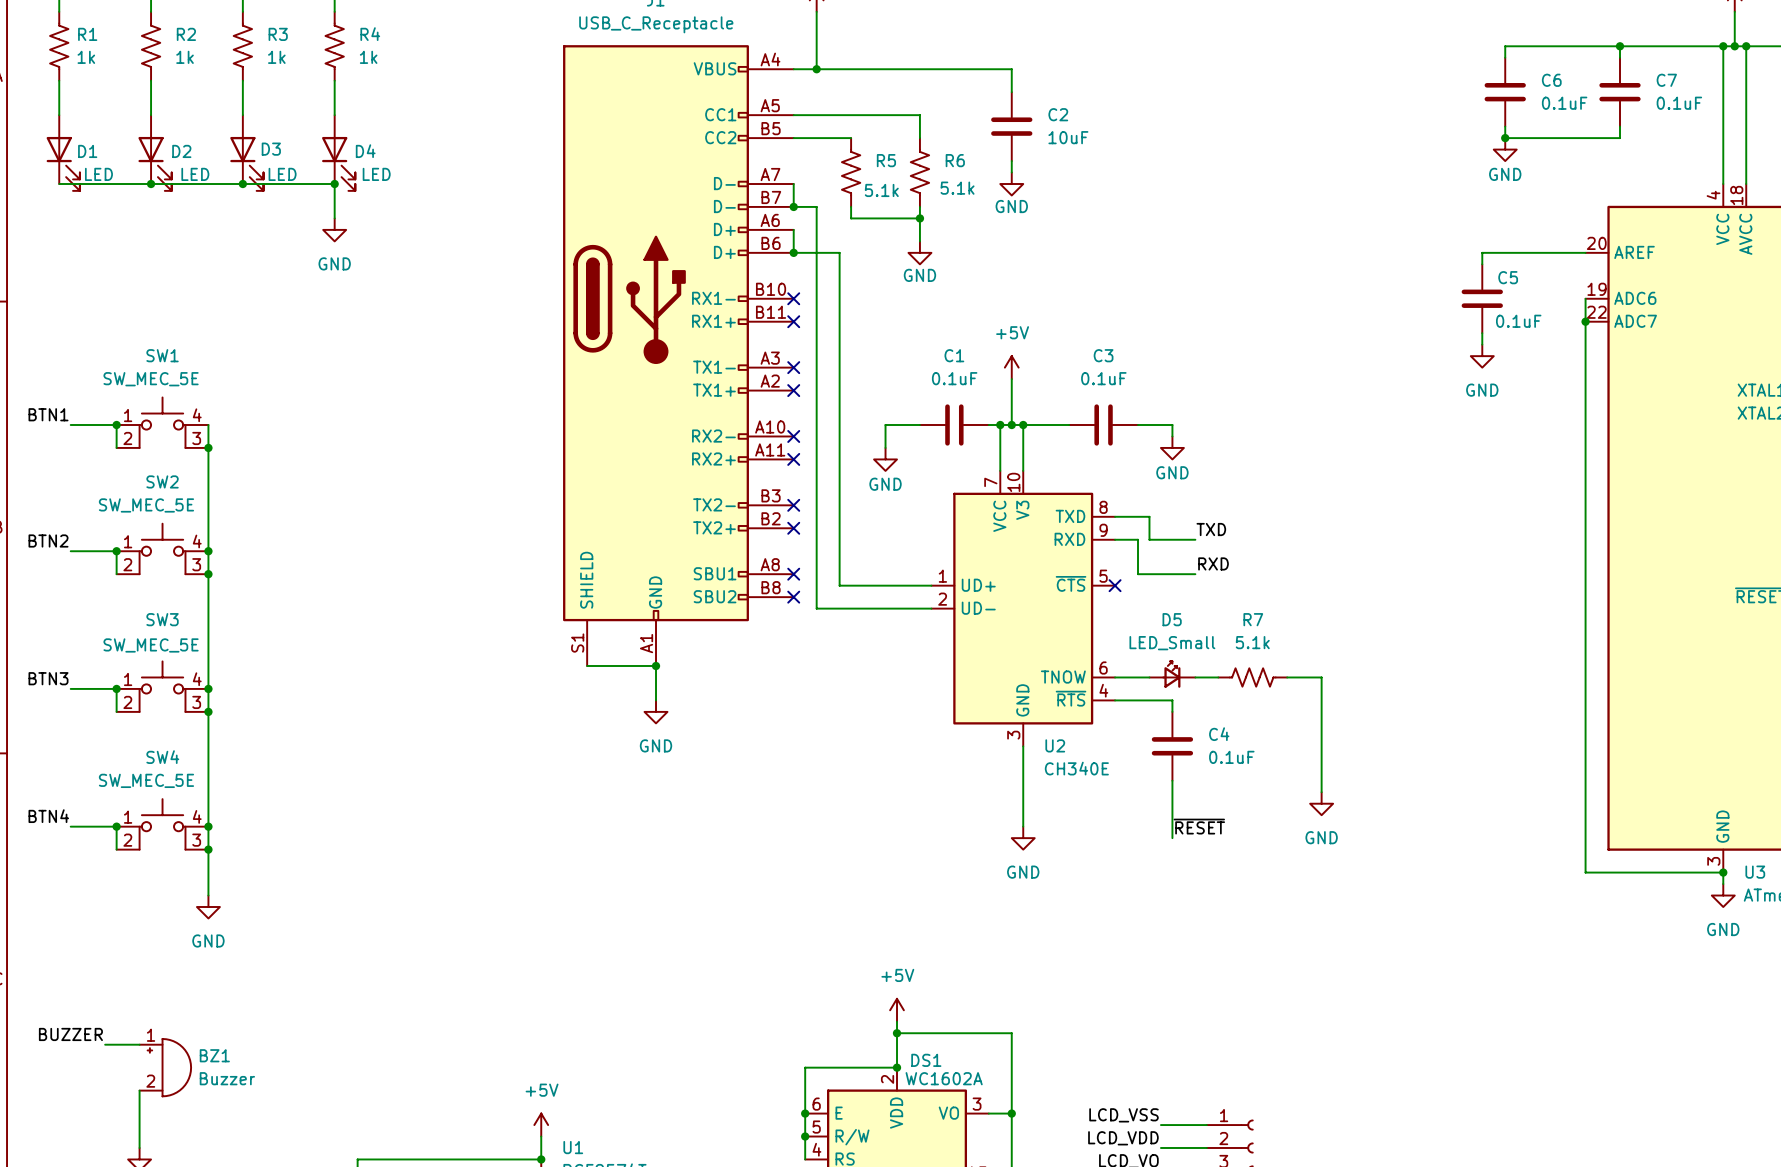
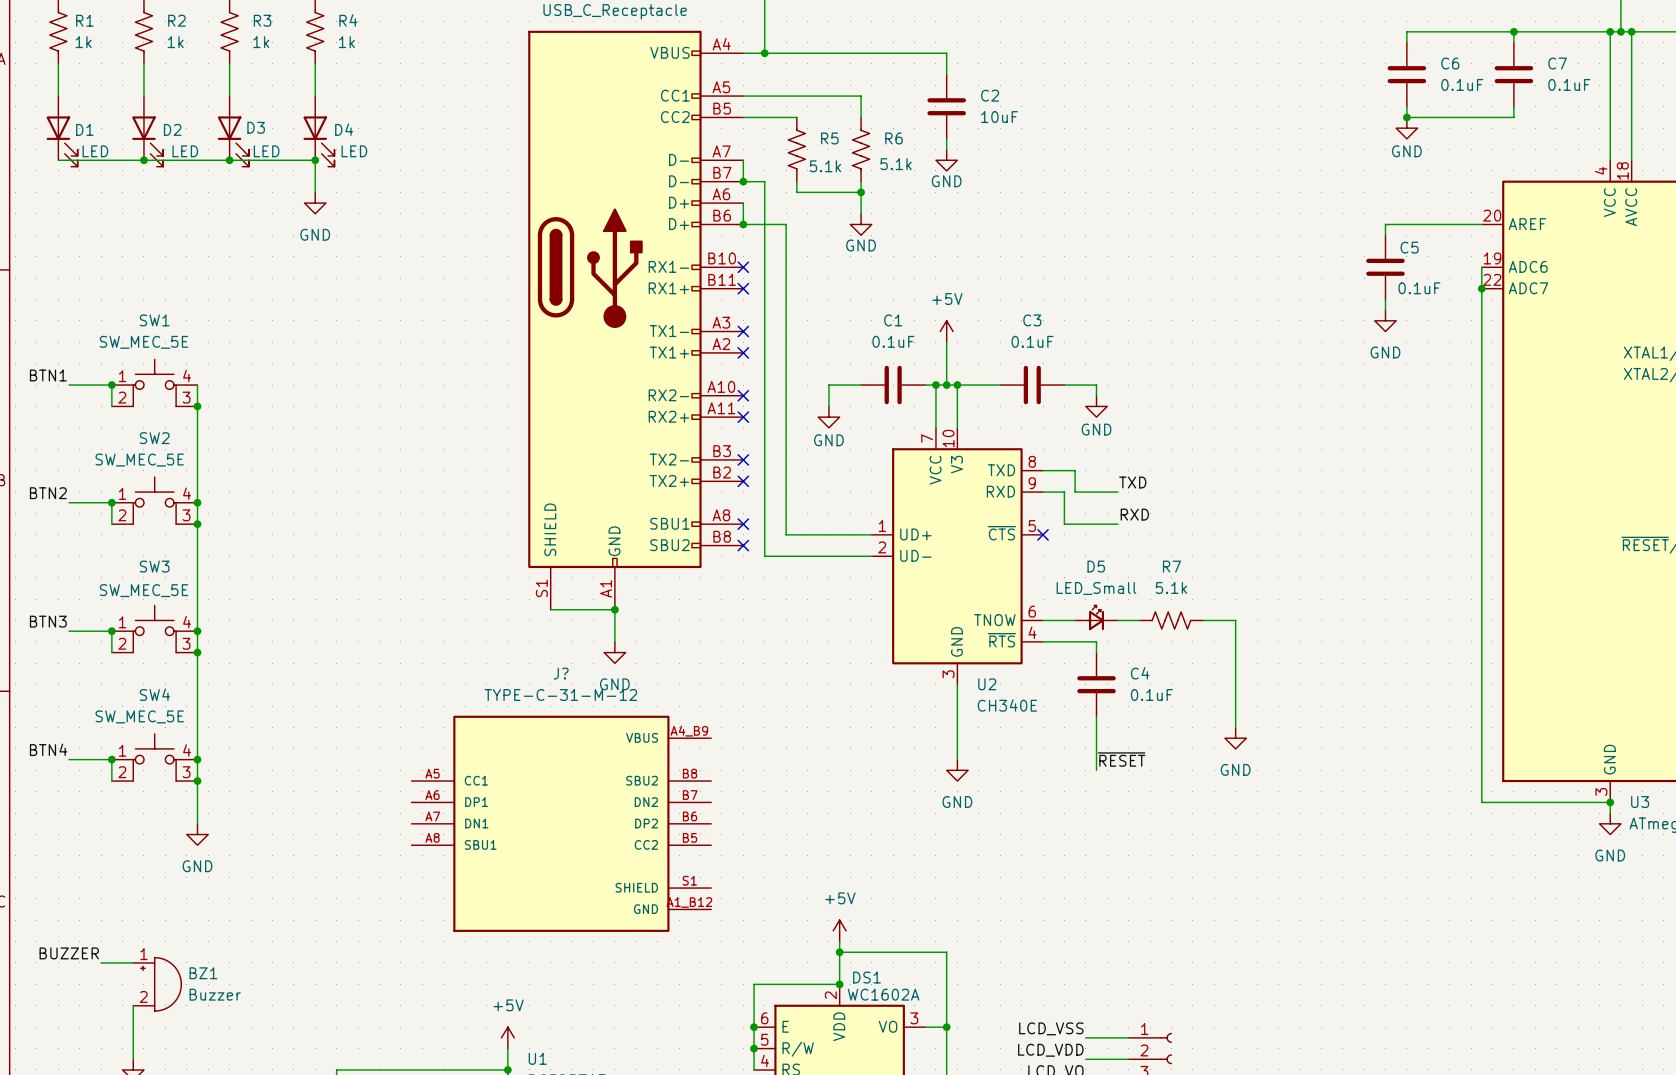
J?: none -> TYPE-C-31-M-12 (561, 823)

